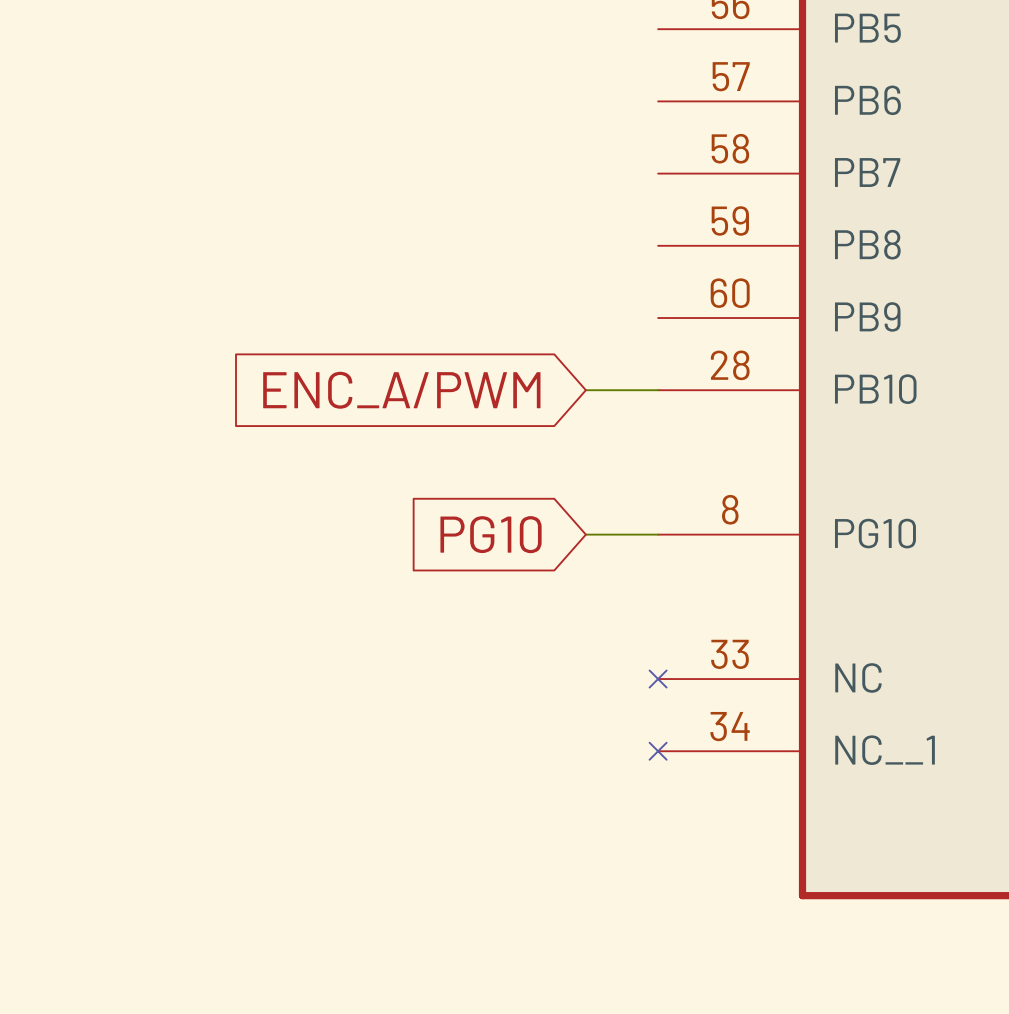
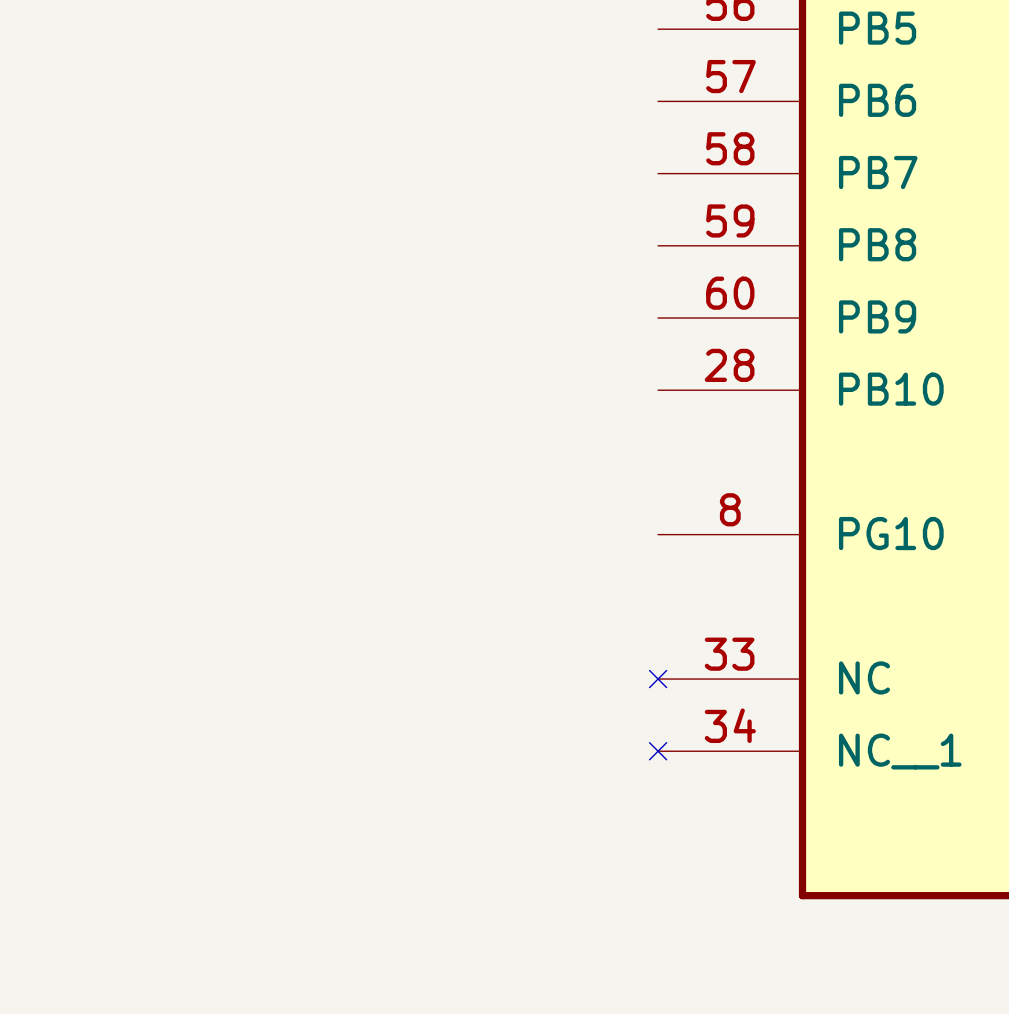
global label: ENC_A/PWM (401, 390) -> none
wire: (585, 390) (658, 390) -> none
global label: PG10 (491, 534) -> none
wire: (585, 534) (658, 534) -> none

